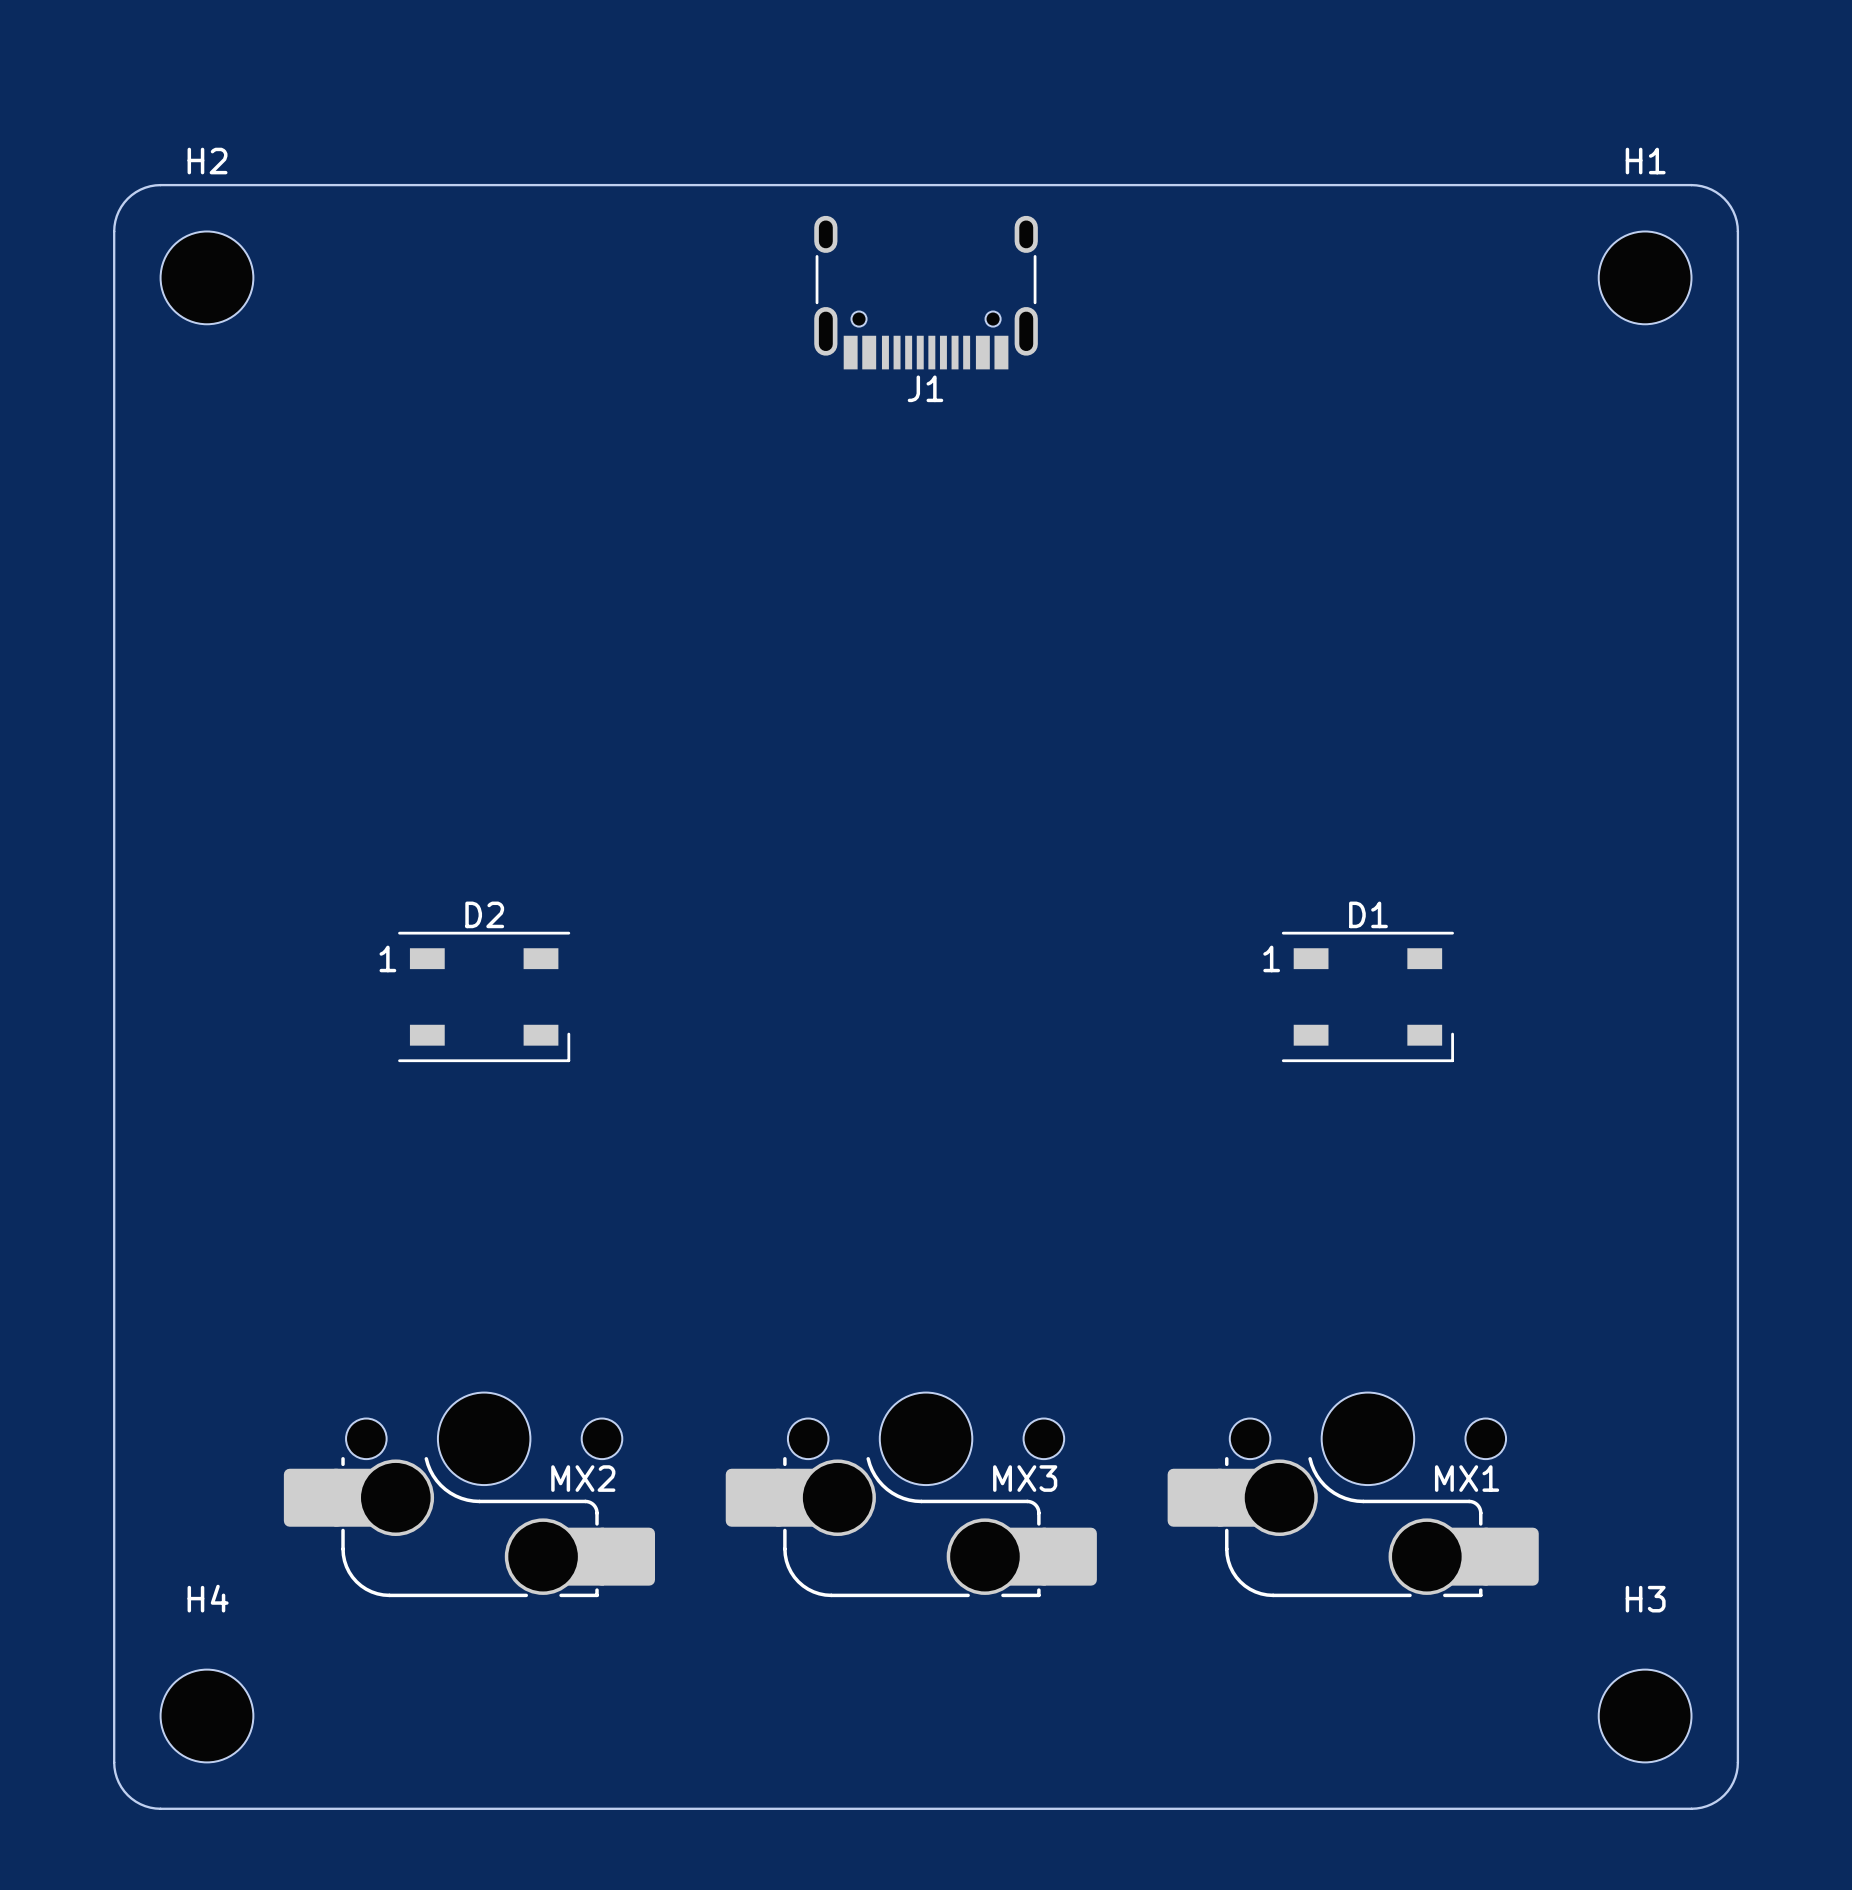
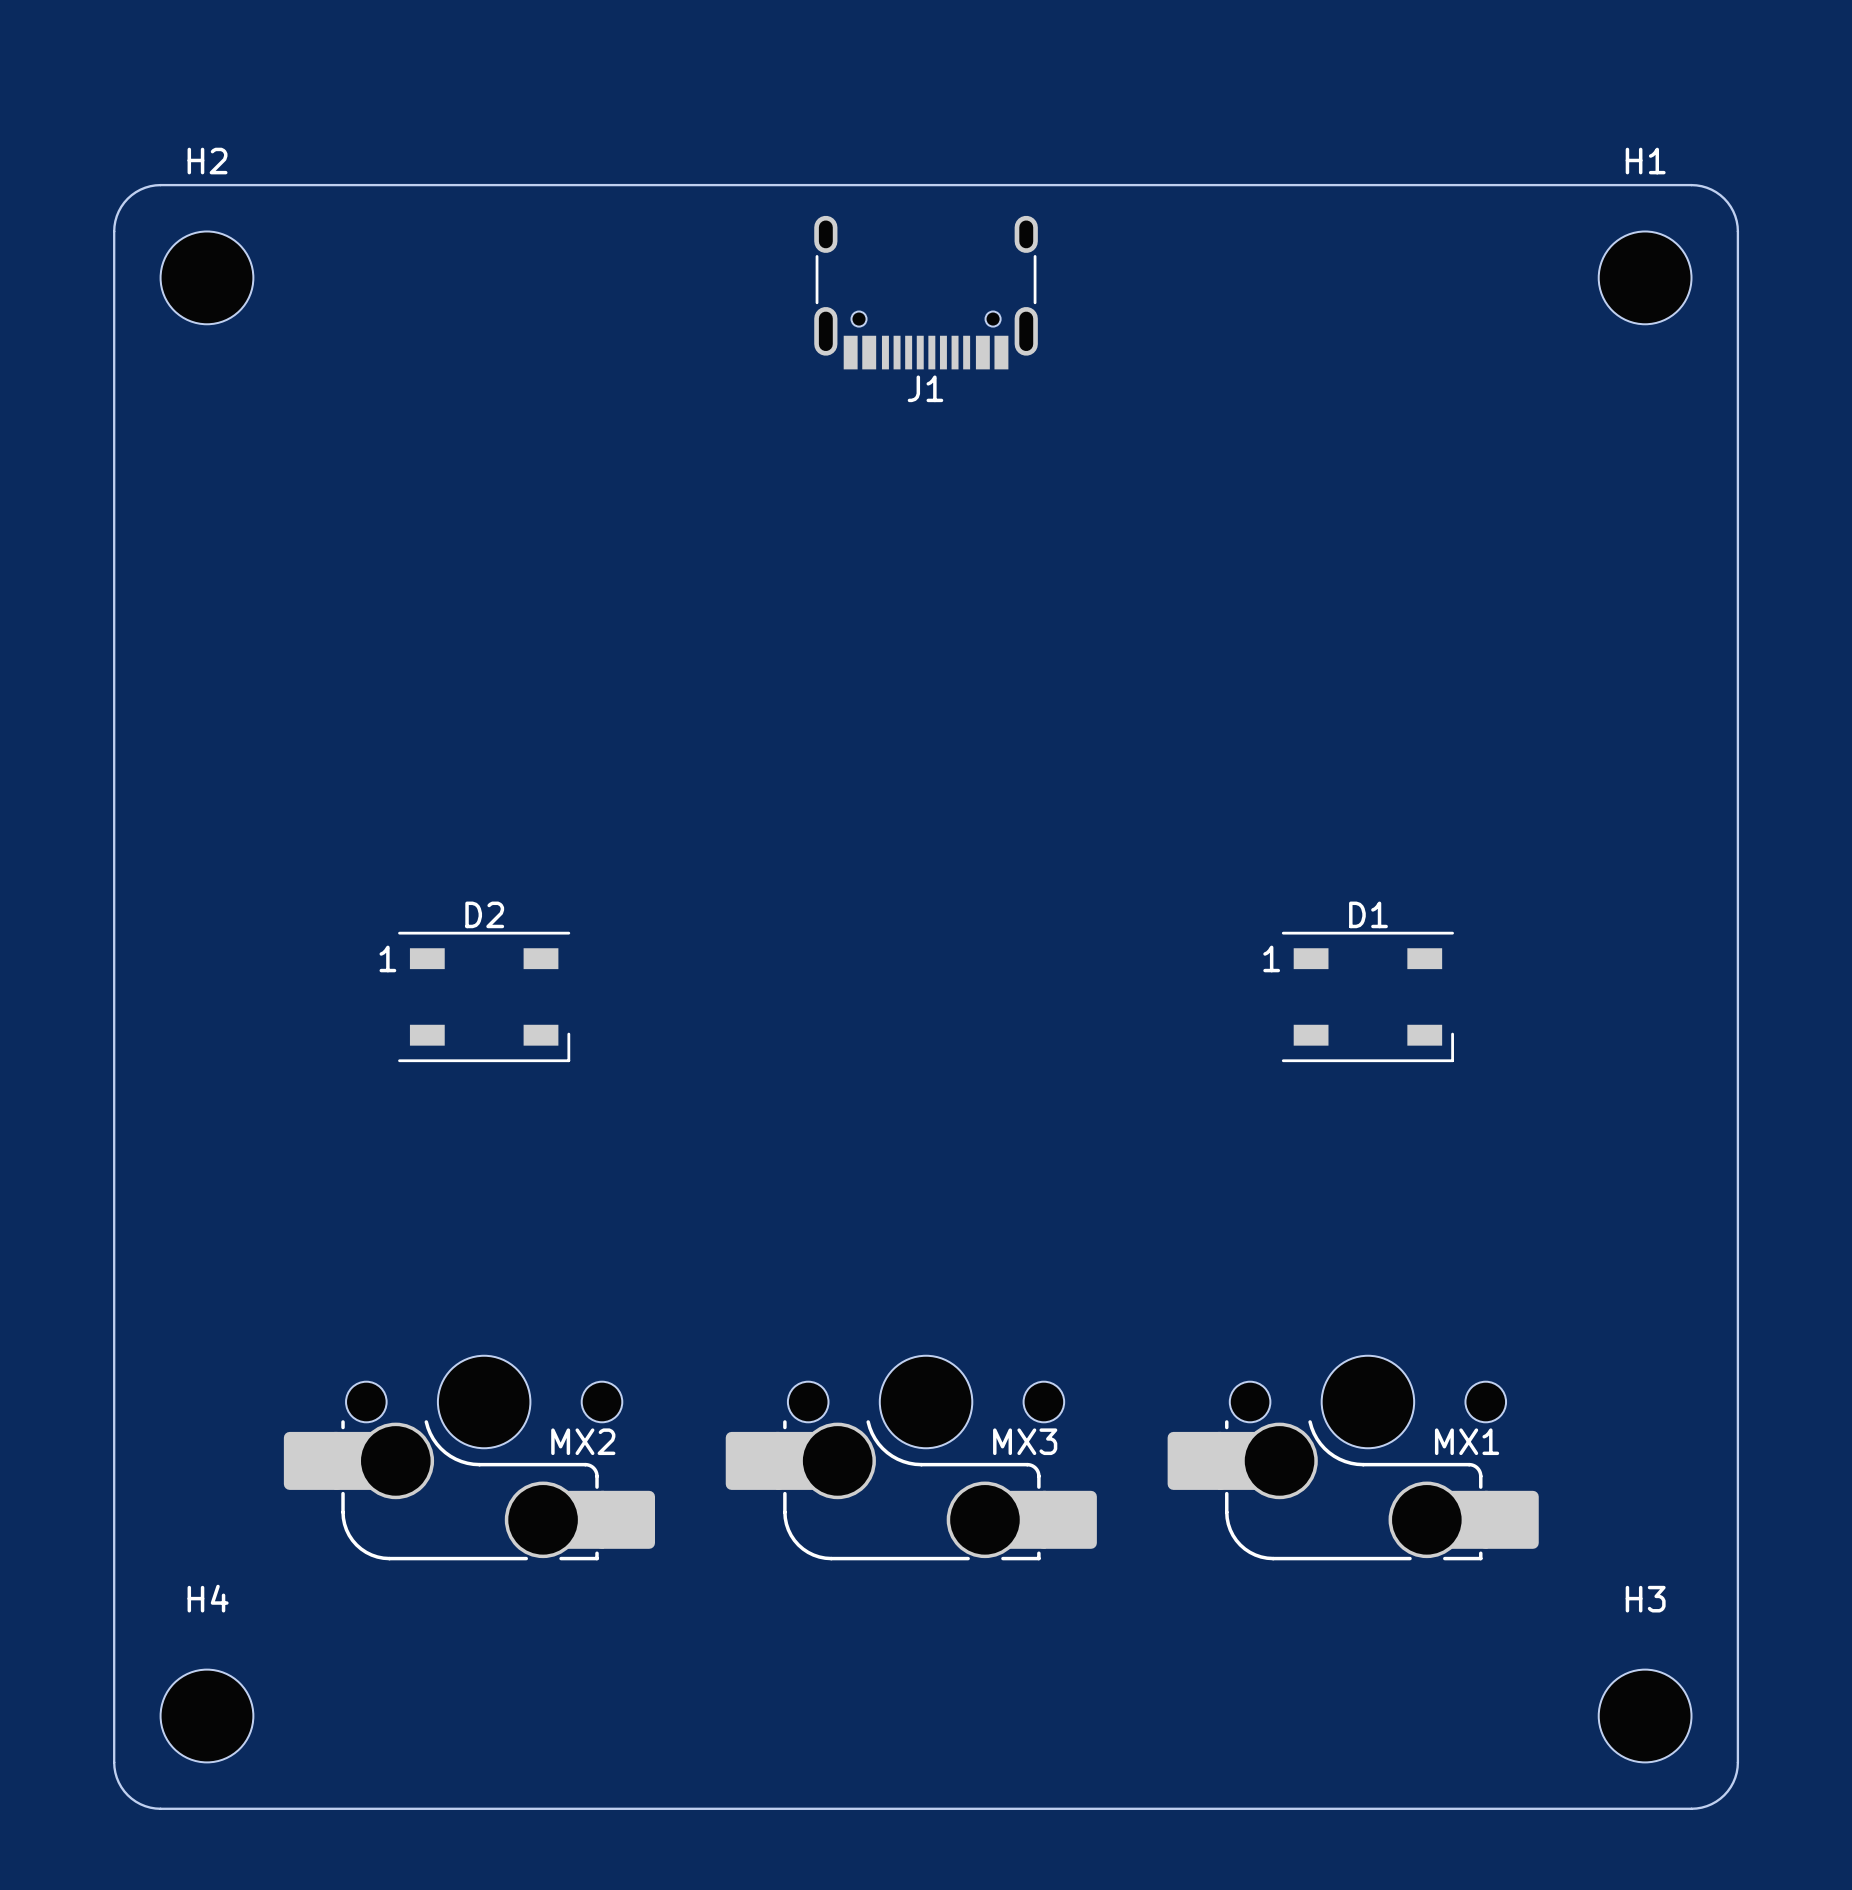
MX2 position: (469, 1494) -> (469, 1458)
MX3 position: (911, 1494) -> (911, 1458)
MX1 position: (1353, 1494) -> (1353, 1458)

